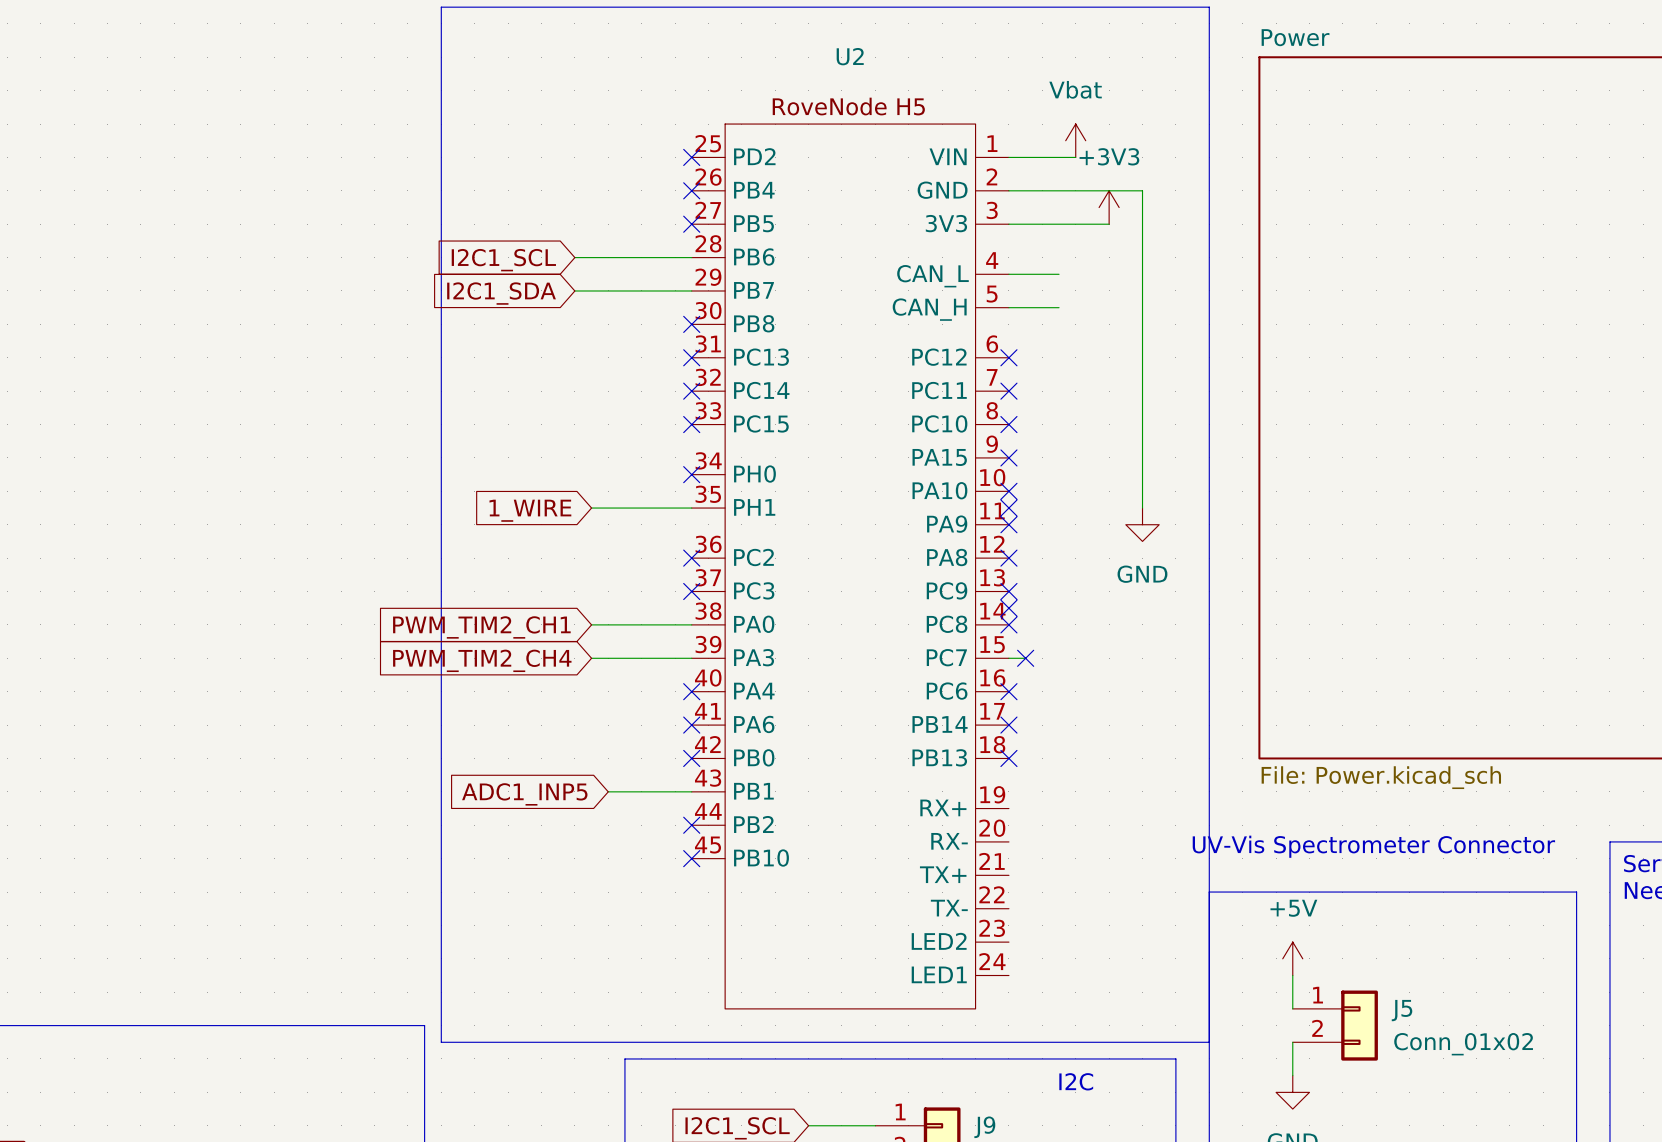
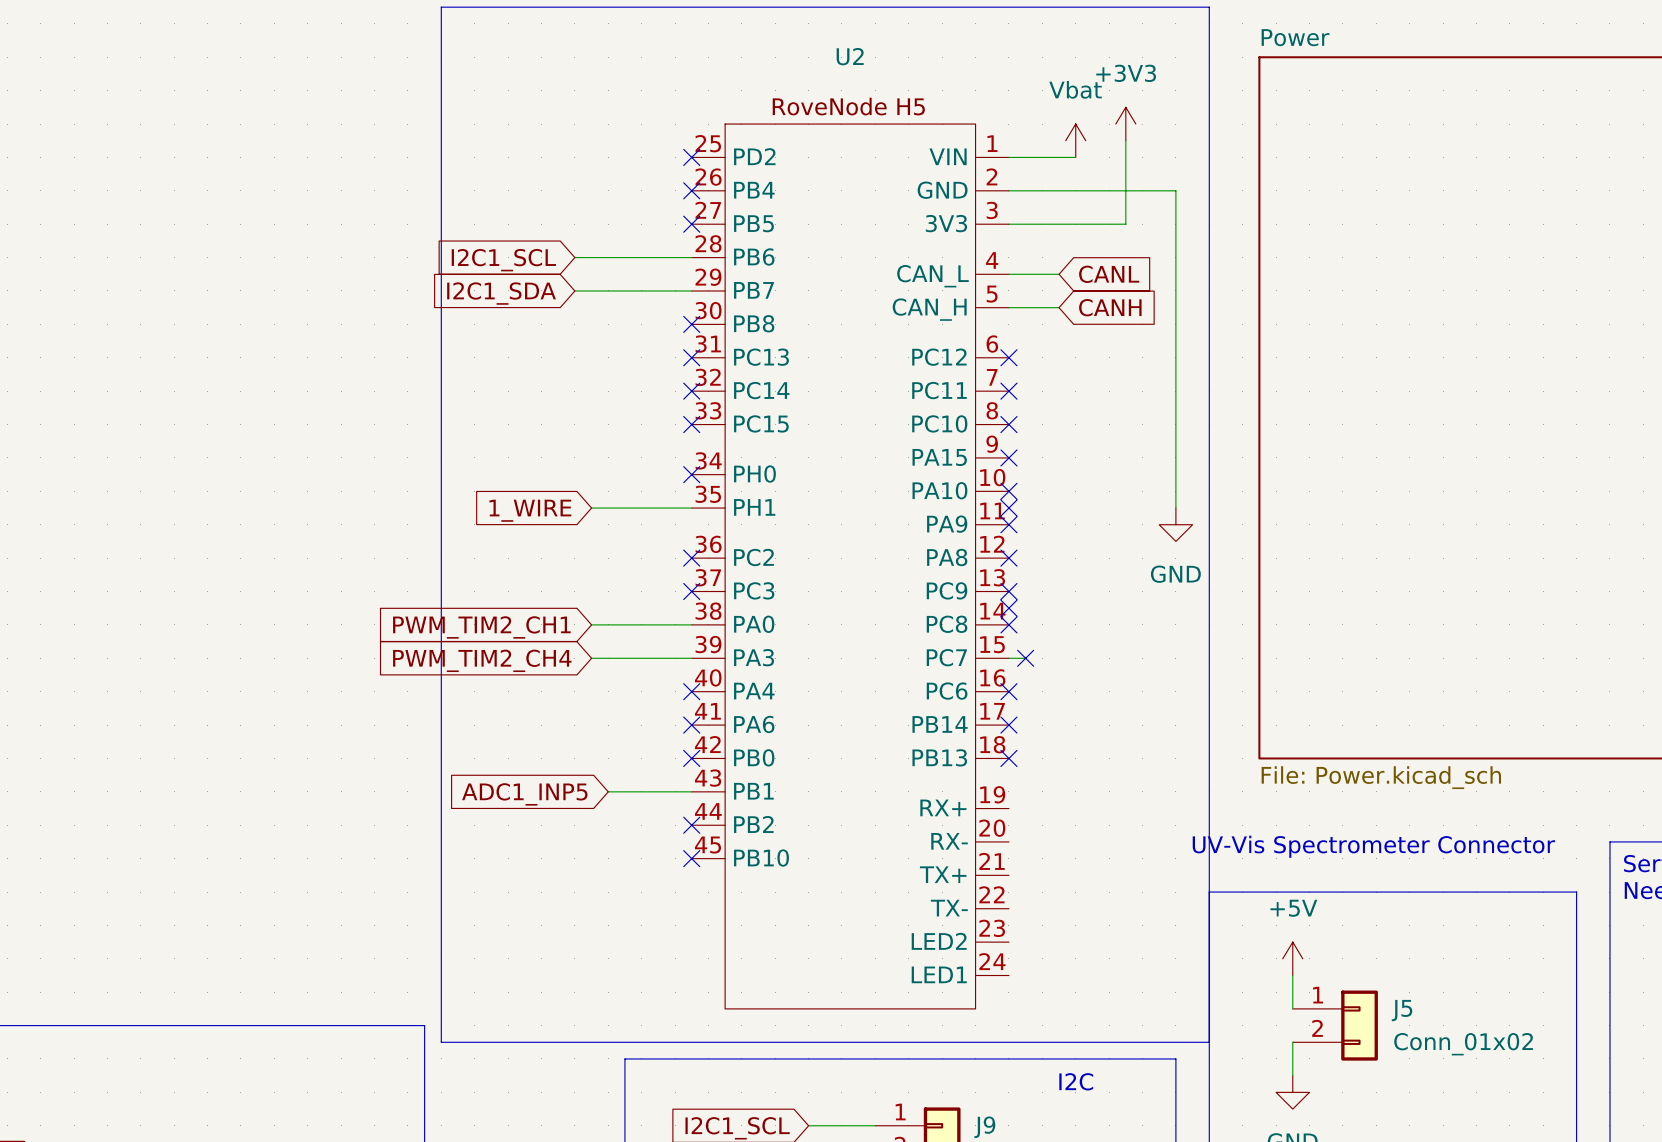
wire: none -> (1125, 140) (1125, 224) (1109, 224)
wire: (1142, 190) (1142, 508) -> (1142, 190) (1175, 190) (1175, 508)
power symbol position: +3V3 (1109, 207) -> +3V3 (1125, 124)
global label: none -> CANL (1109, 274)
global label: none -> CANH (1110, 307)
power symbol position: GND (1142, 524) -> GND (1175, 524)

